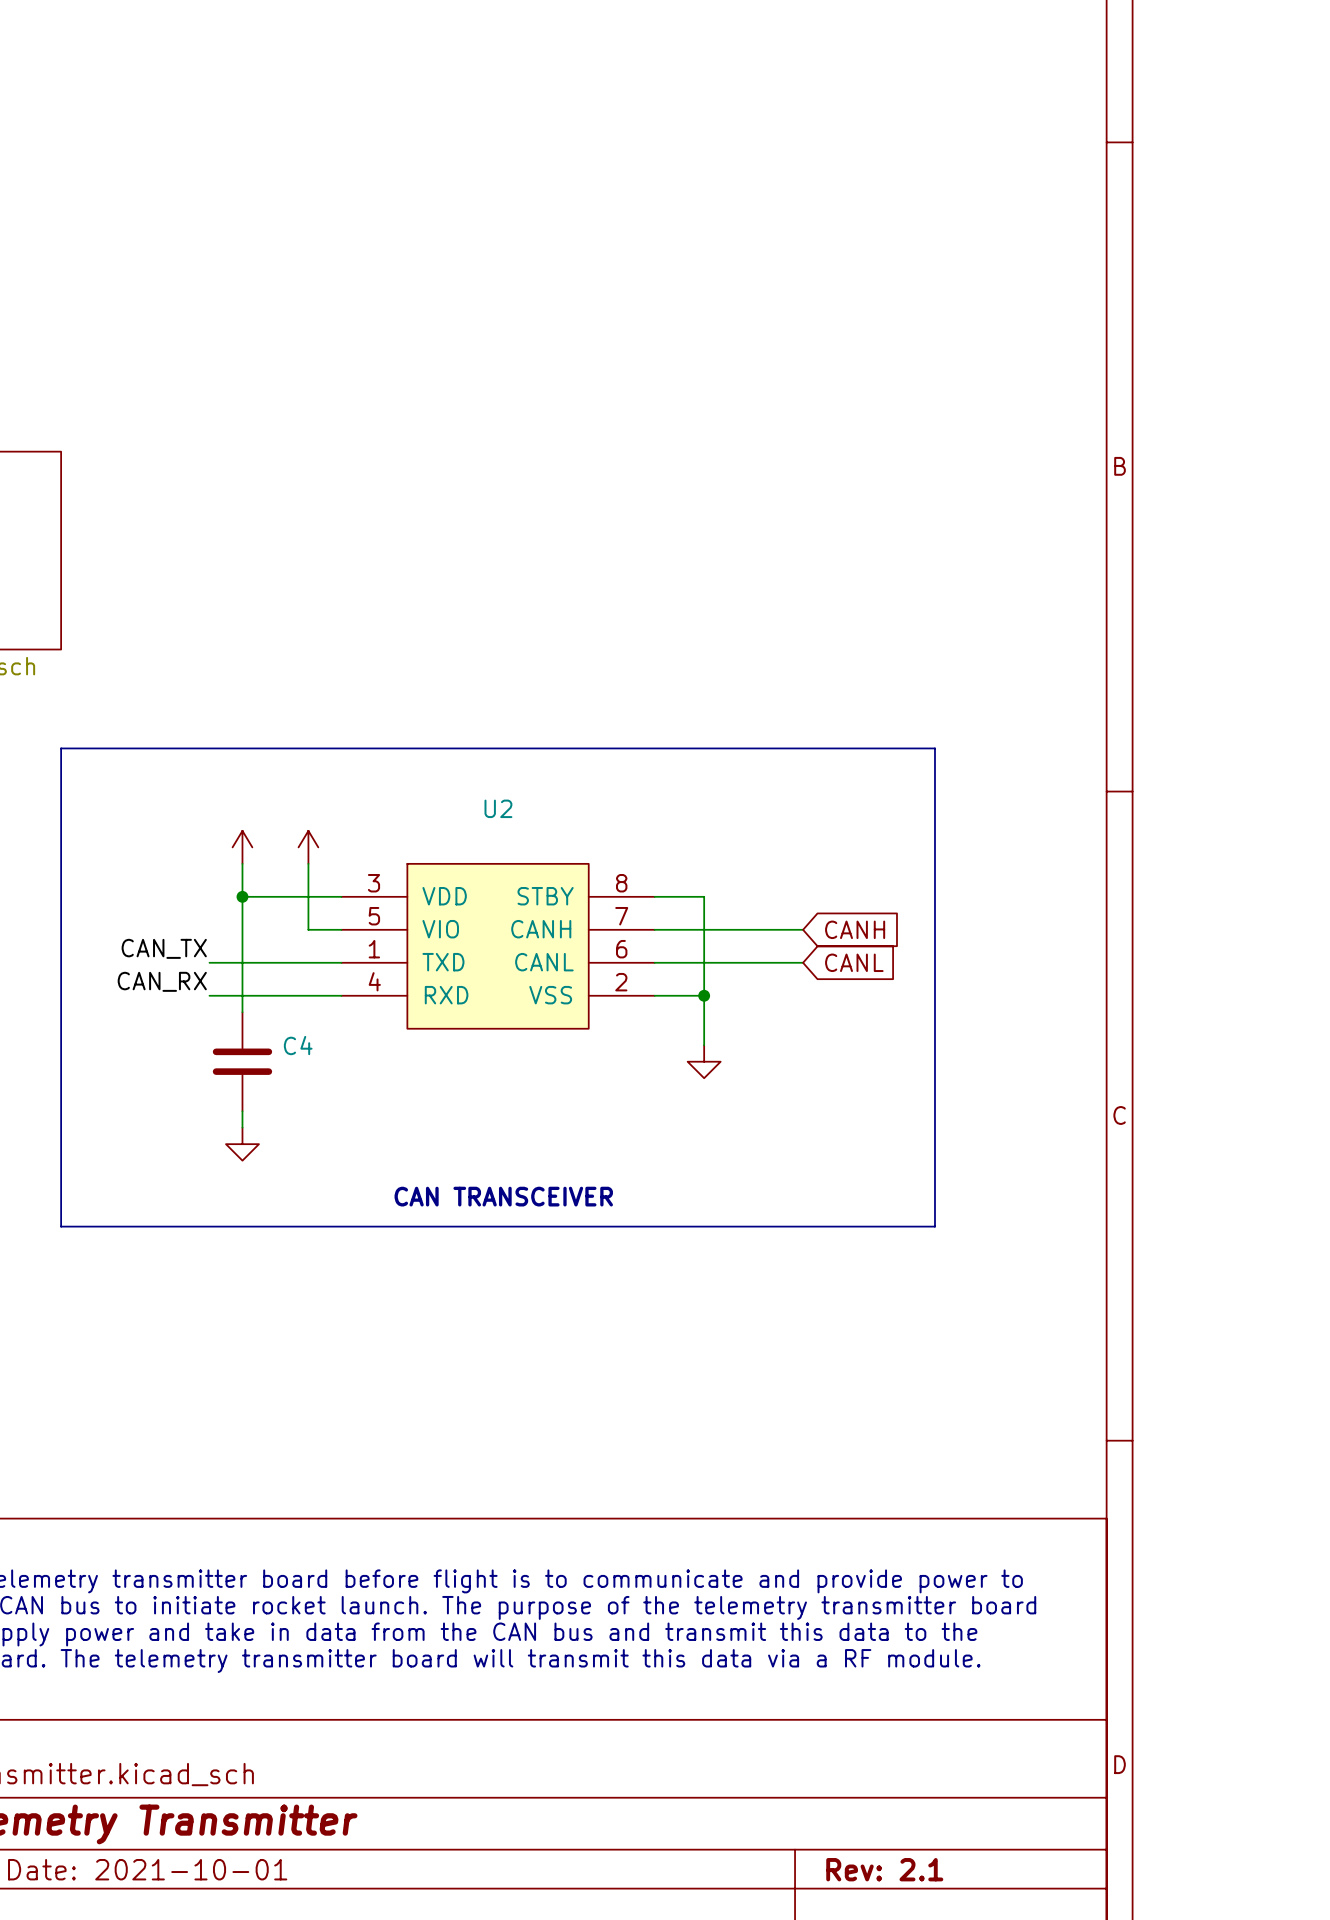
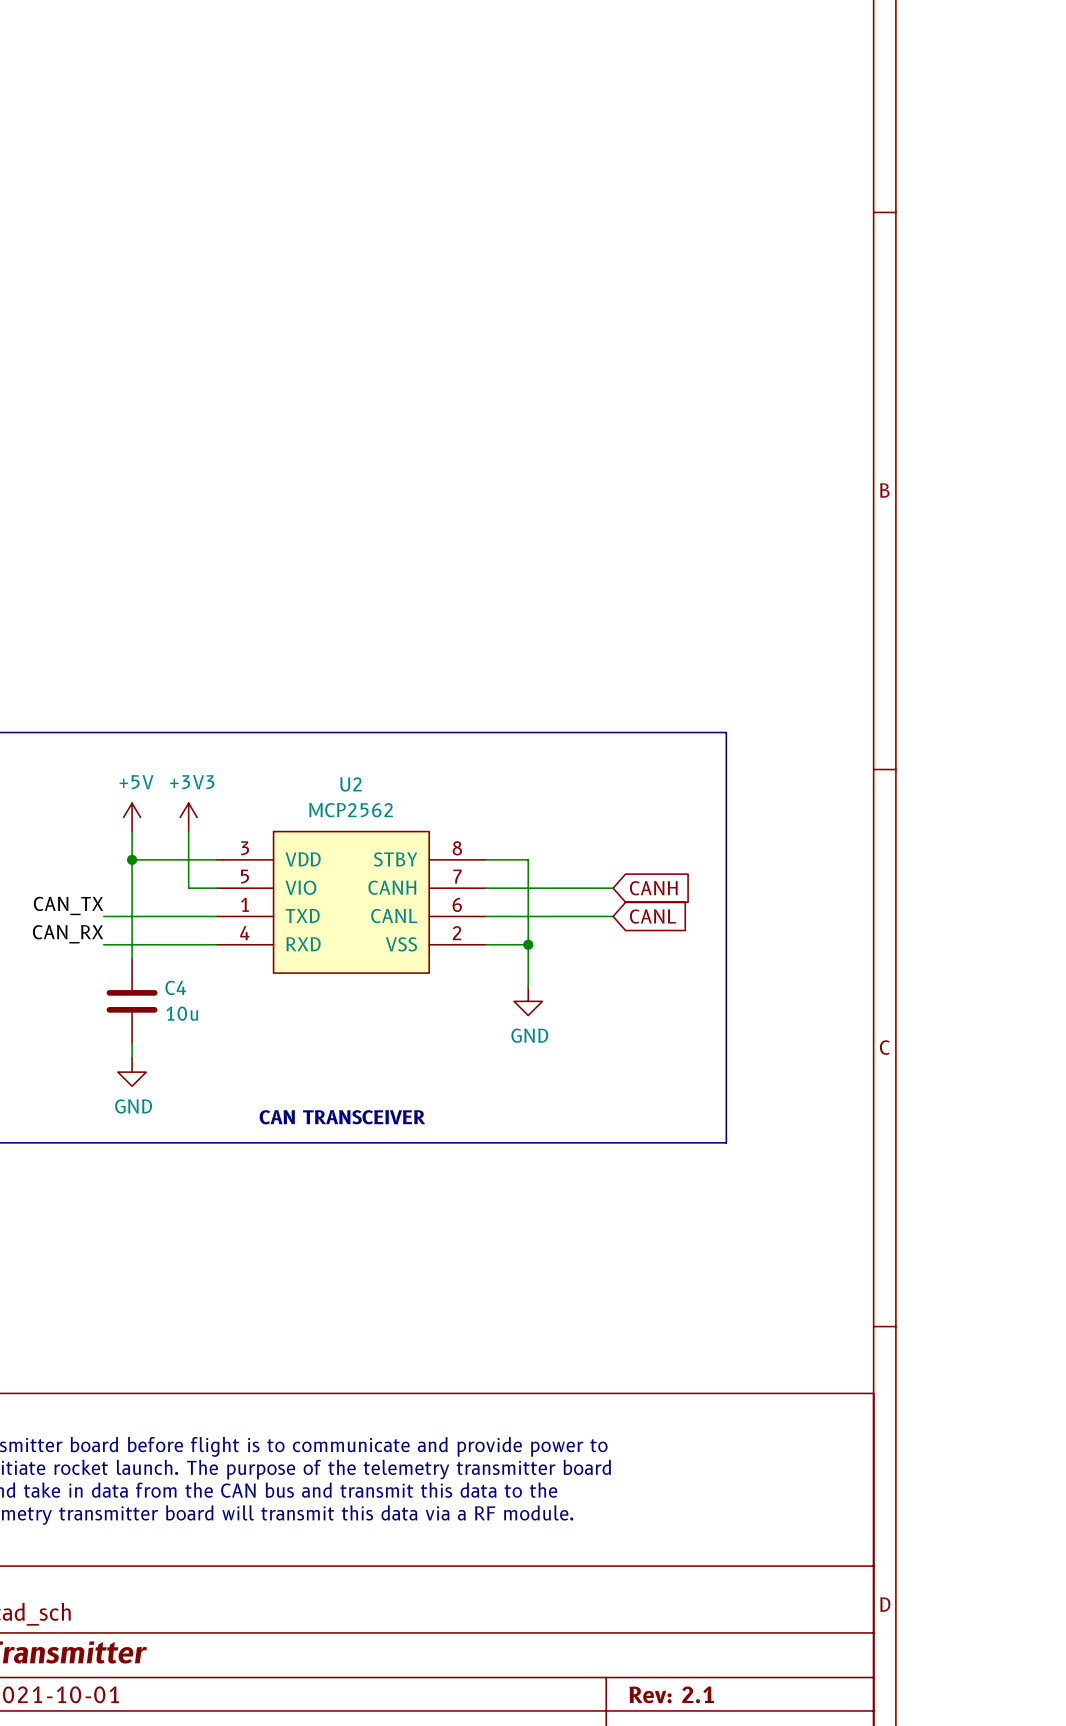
power symbol text: none -> +5V (136, 782)
power symbol text: none -> +3V3 (192, 782)
U2 value: none -> MCP2562 (351, 810)
C4 value: none -> 10u (182, 1013)
power symbol text: none -> GND (529, 1035)
power symbol text: none -> GND (133, 1106)

